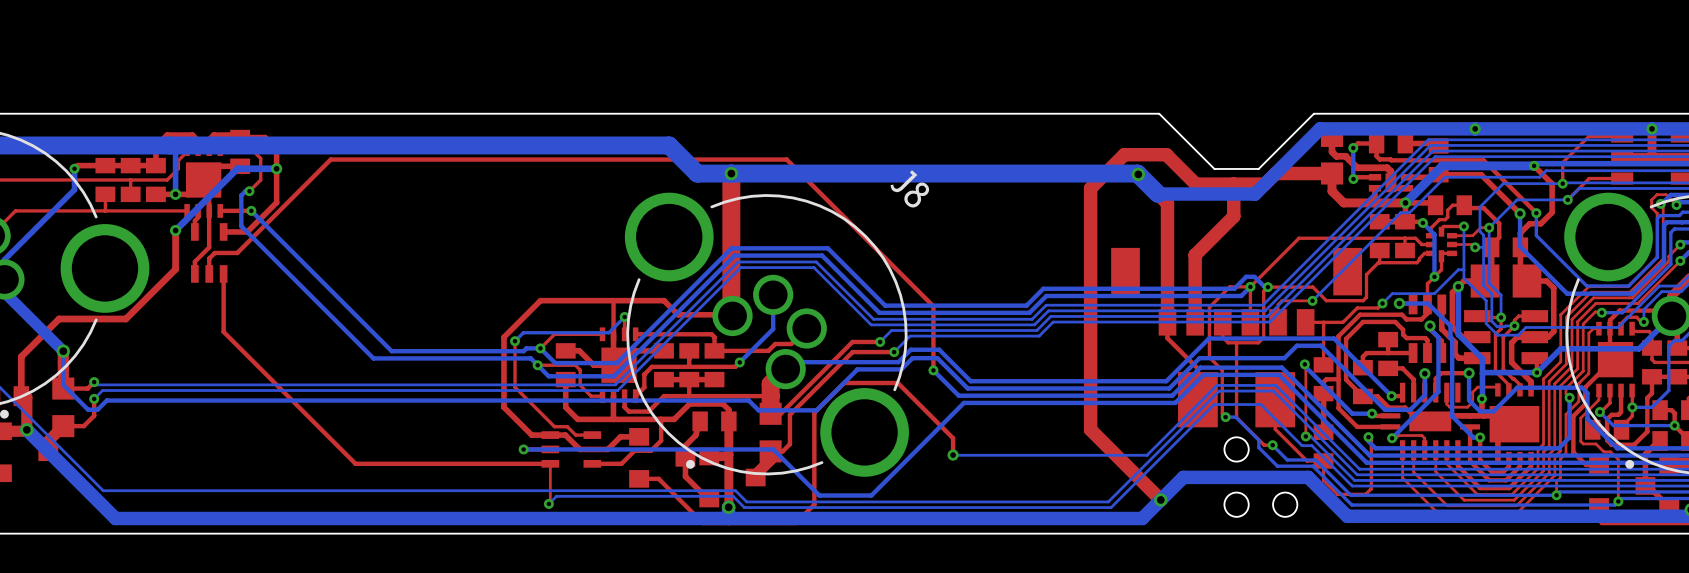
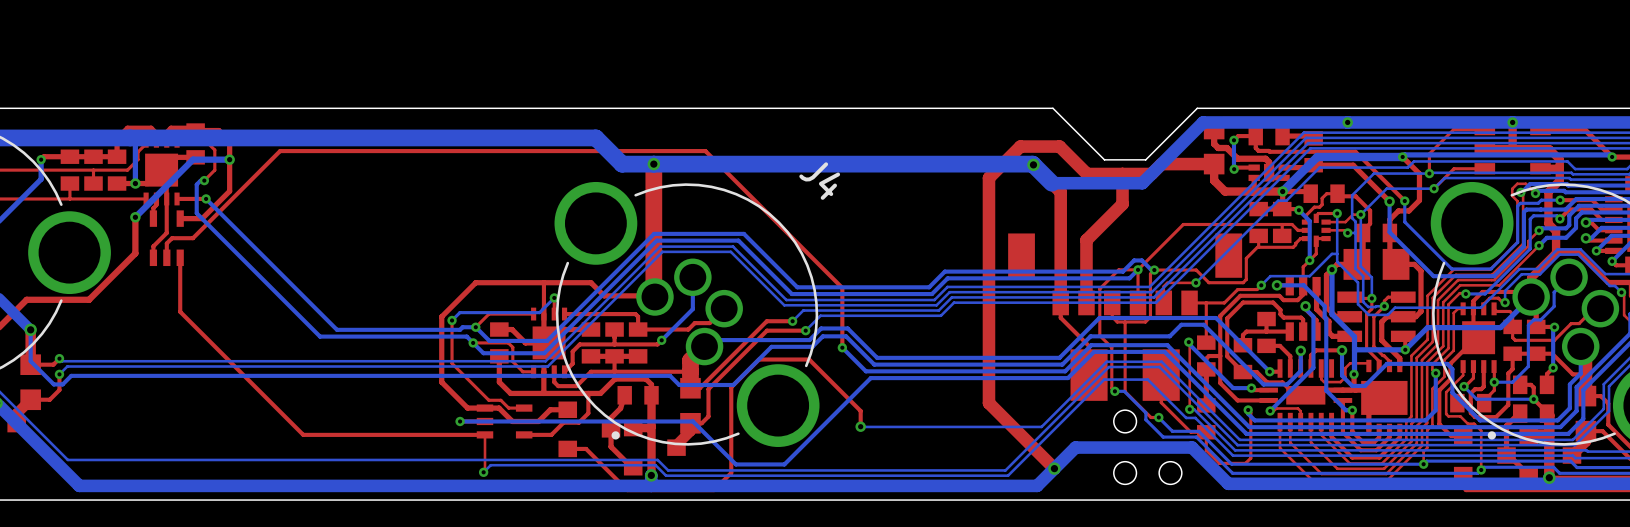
J8 name: J8 (909, 188) -> J4 (819, 181)

